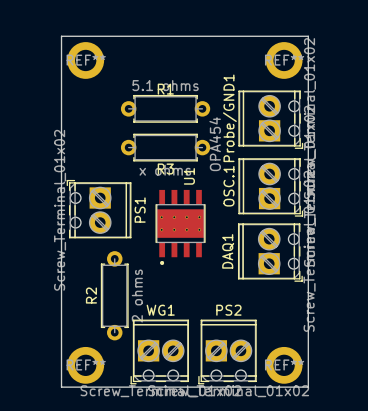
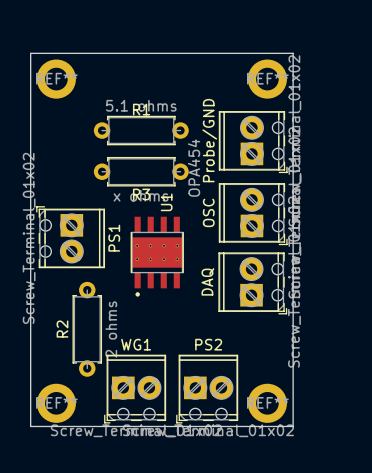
Probe/GND1 name: Probe/GND1 (229, 118) -> Probe/GND (209, 140)
OSC.1 name: OSC.1 (228, 186) -> OSC (208, 212)
DAQ1 name: DAQ1 (228, 251) -> DAQ (207, 281)

